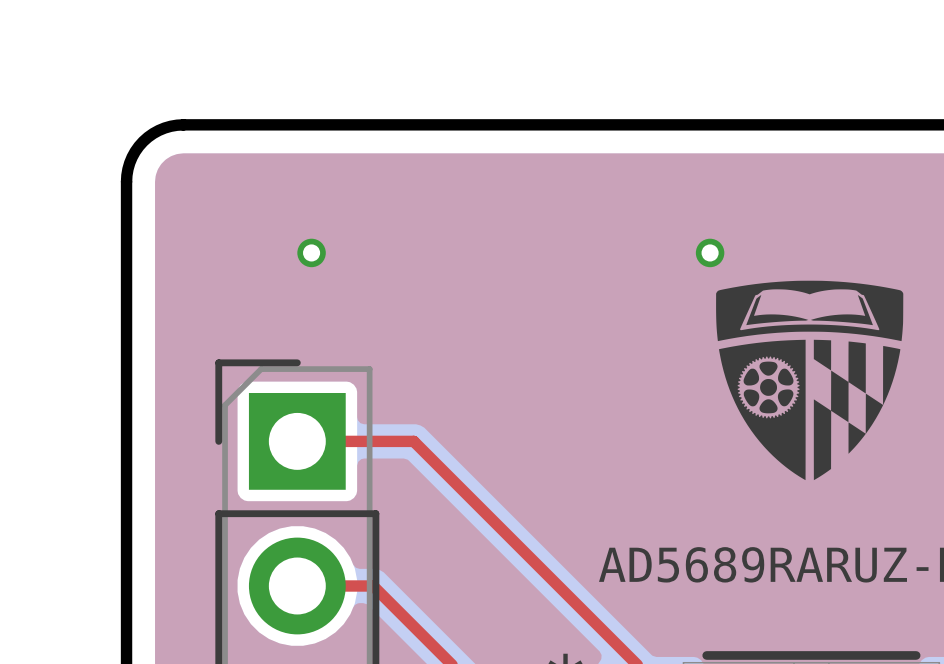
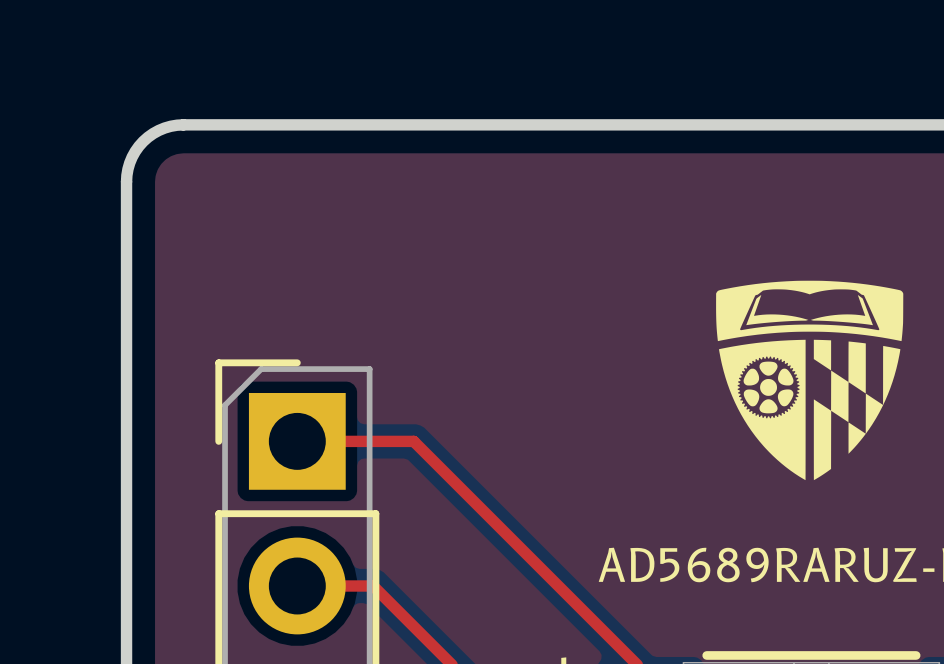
via: (311, 252) -> none
via: (710, 252) -> none

